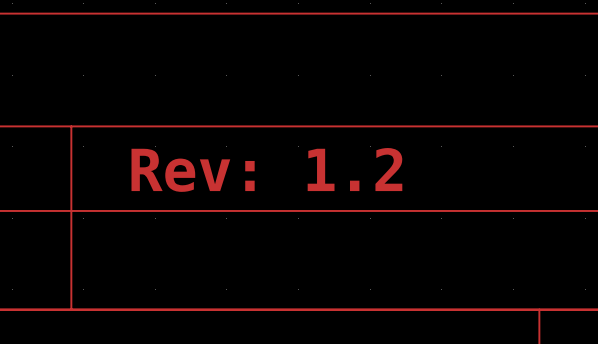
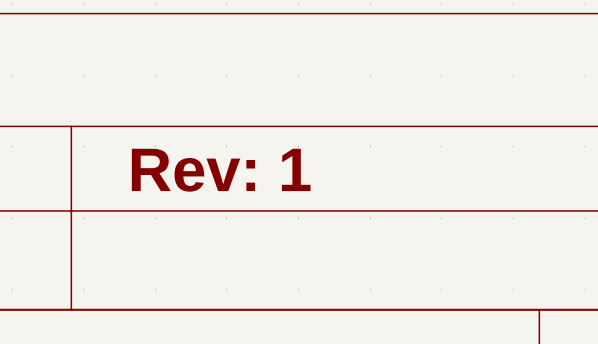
title block: Rev: 1.2 (266, 169) -> Rev: 1 (221, 170)

